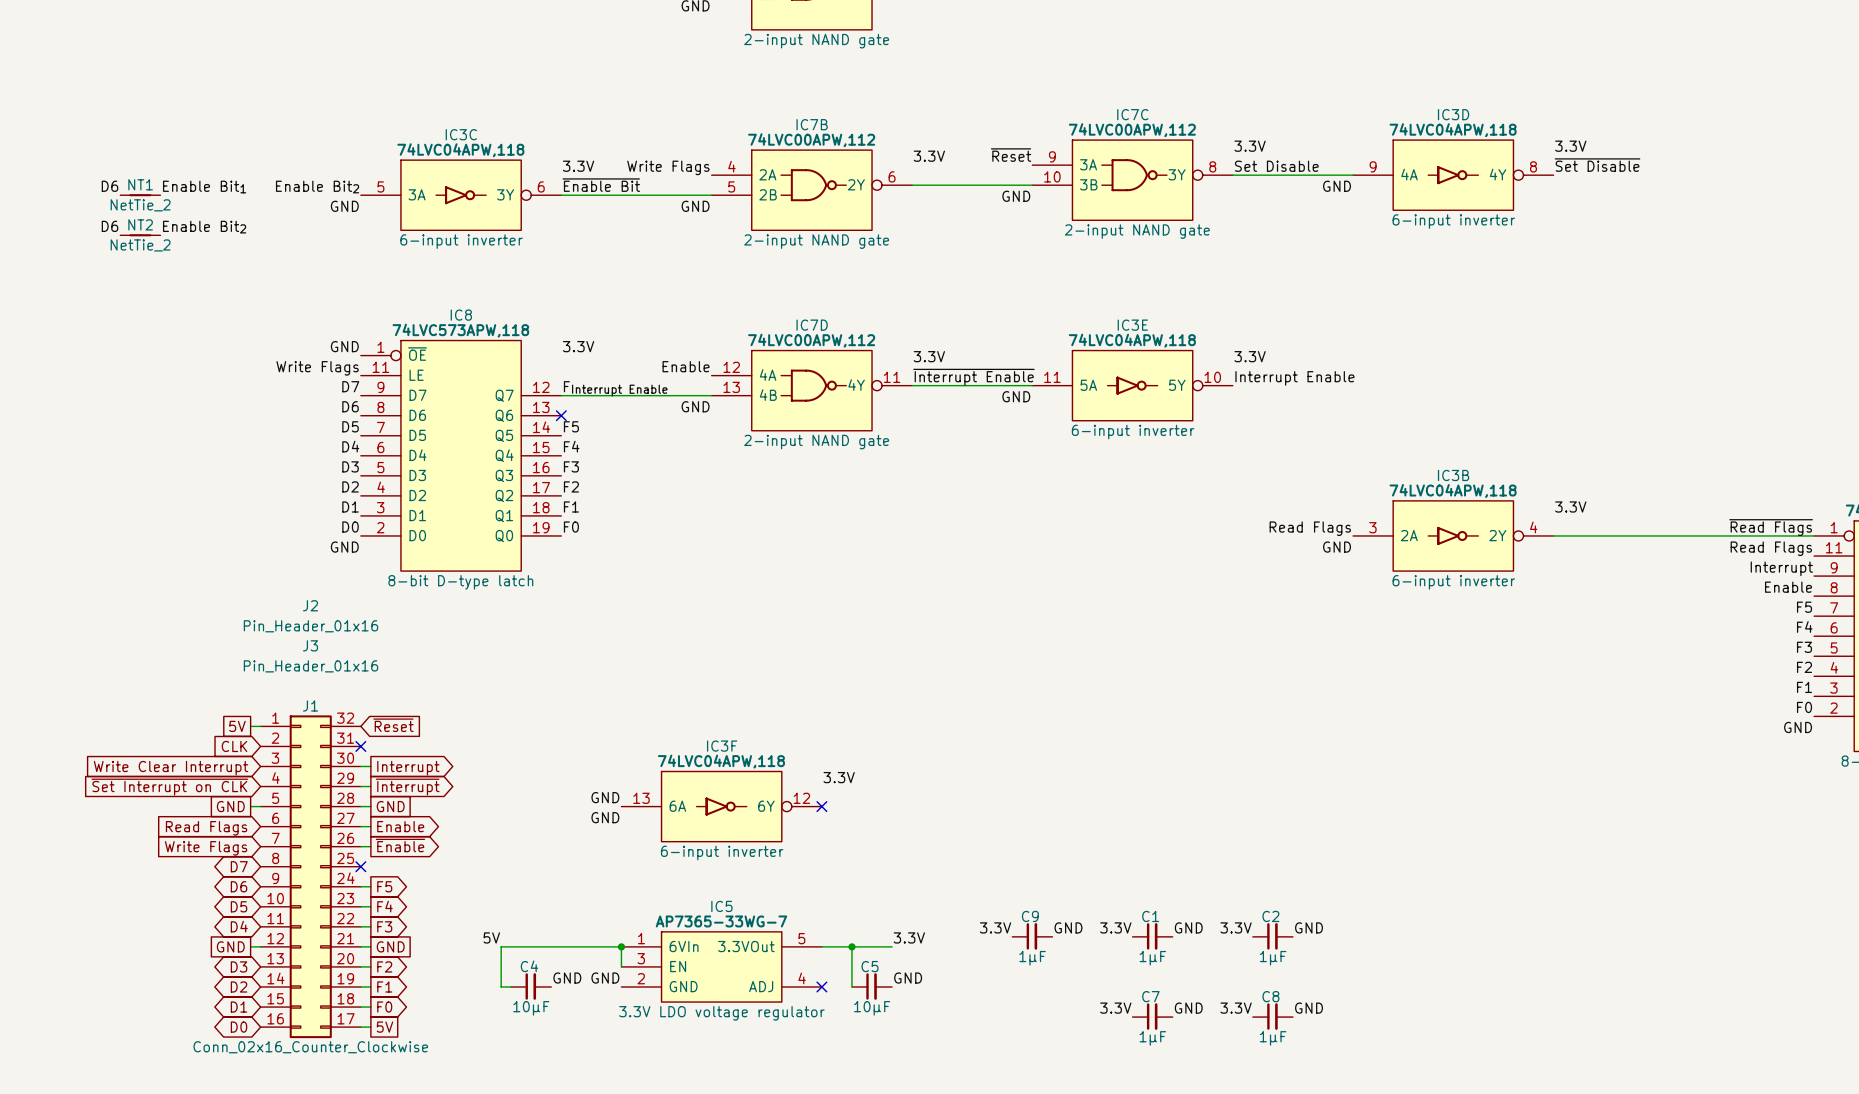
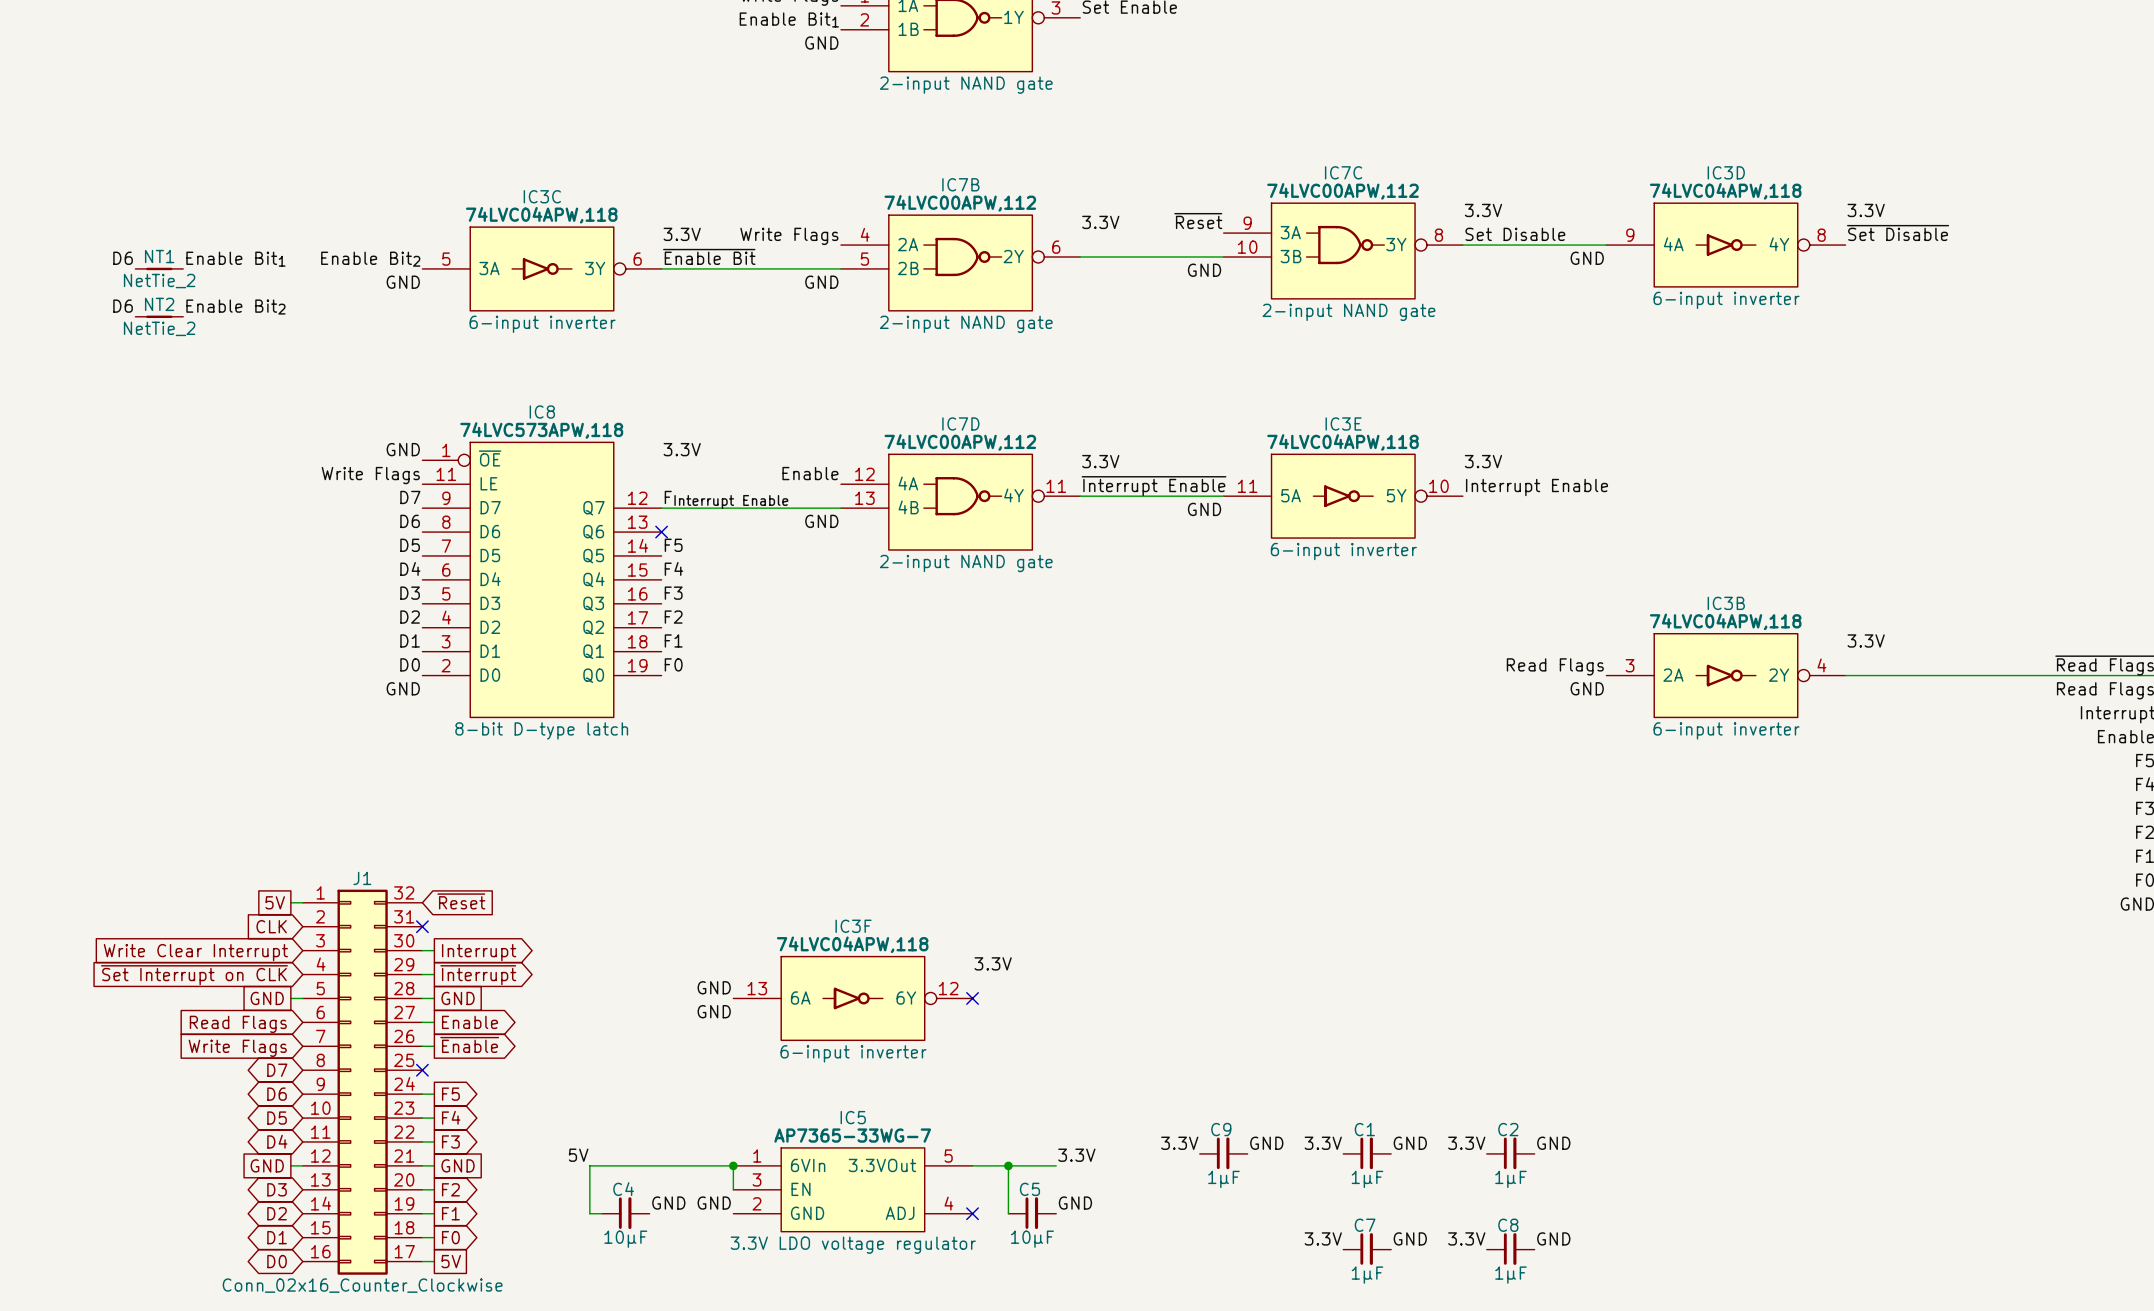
J2: Pin_Header_01x16 (310, 616) -> none
J3: Pin_Header_01x16 (310, 656) -> none

